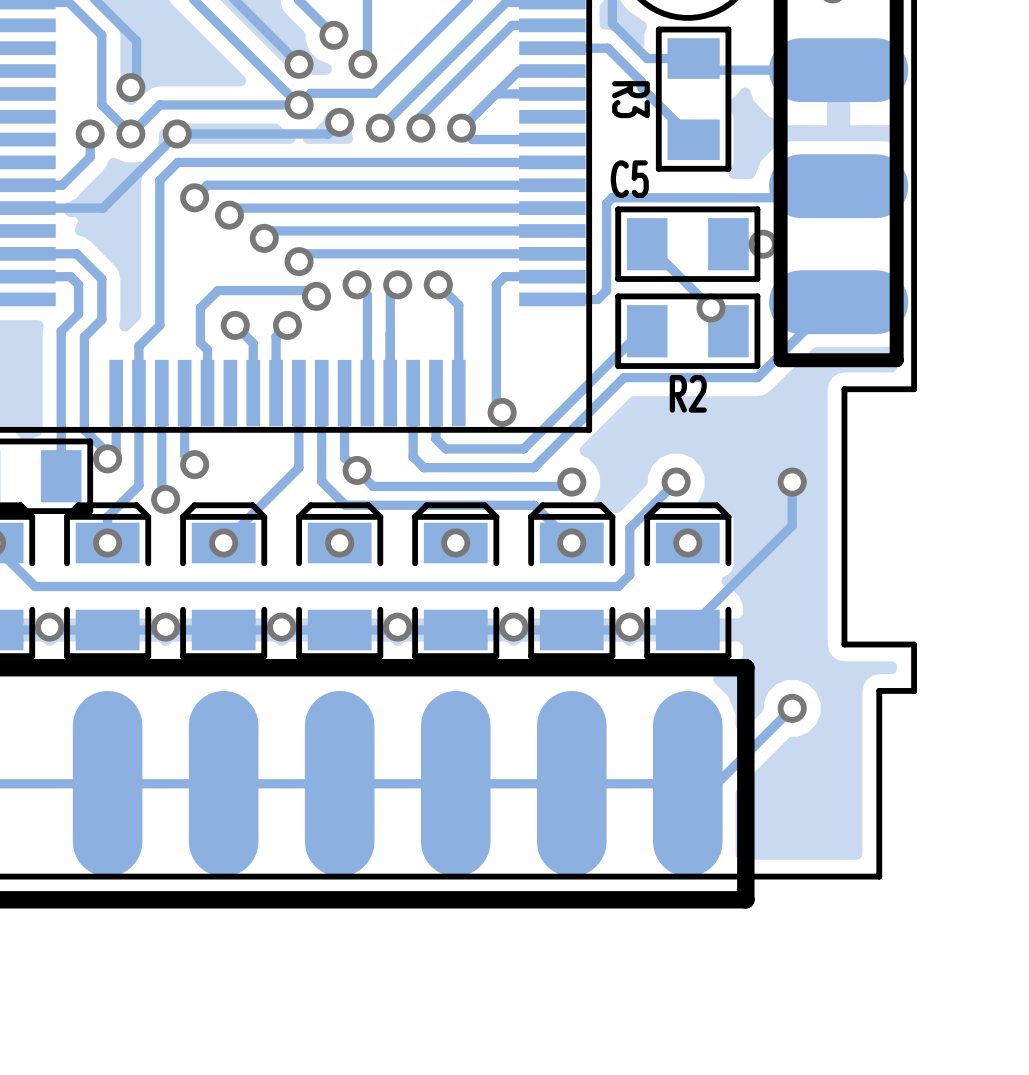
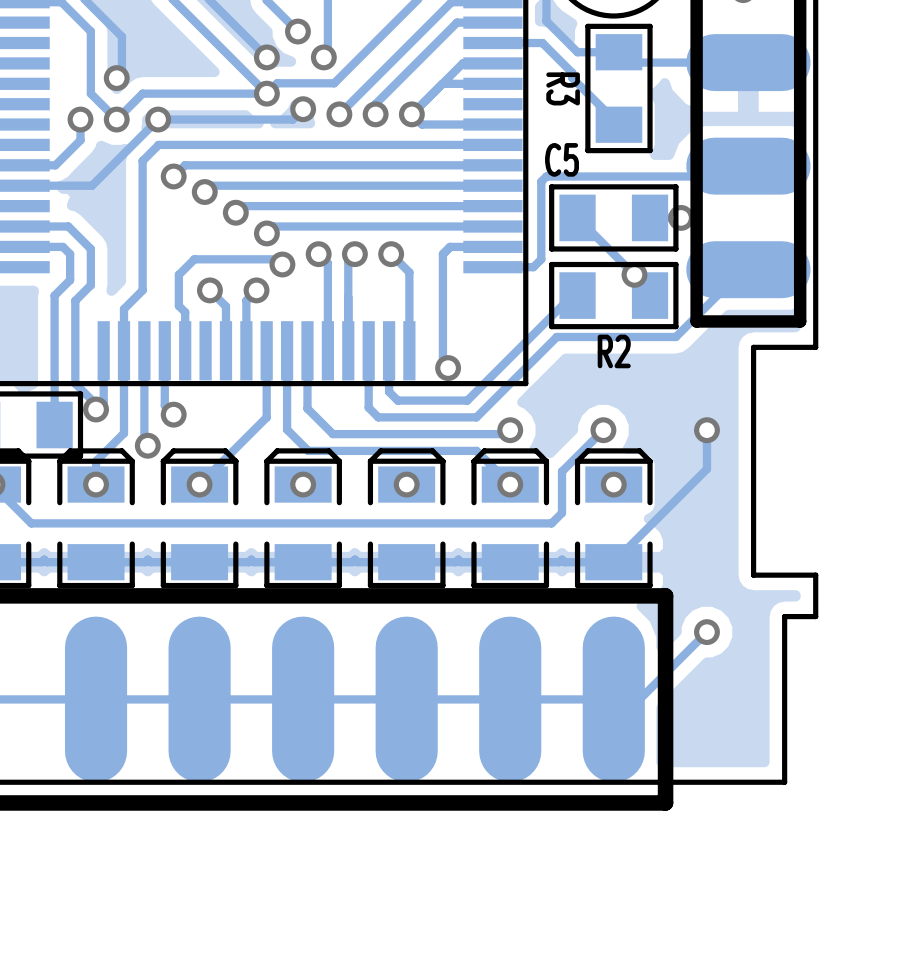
via: (357, 470) -> none
via: (49, 627) -> none
via: (165, 627) -> none
via: (281, 627) -> none
via: (397, 627) -> none
via: (513, 627) -> none
via: (629, 627) -> none

